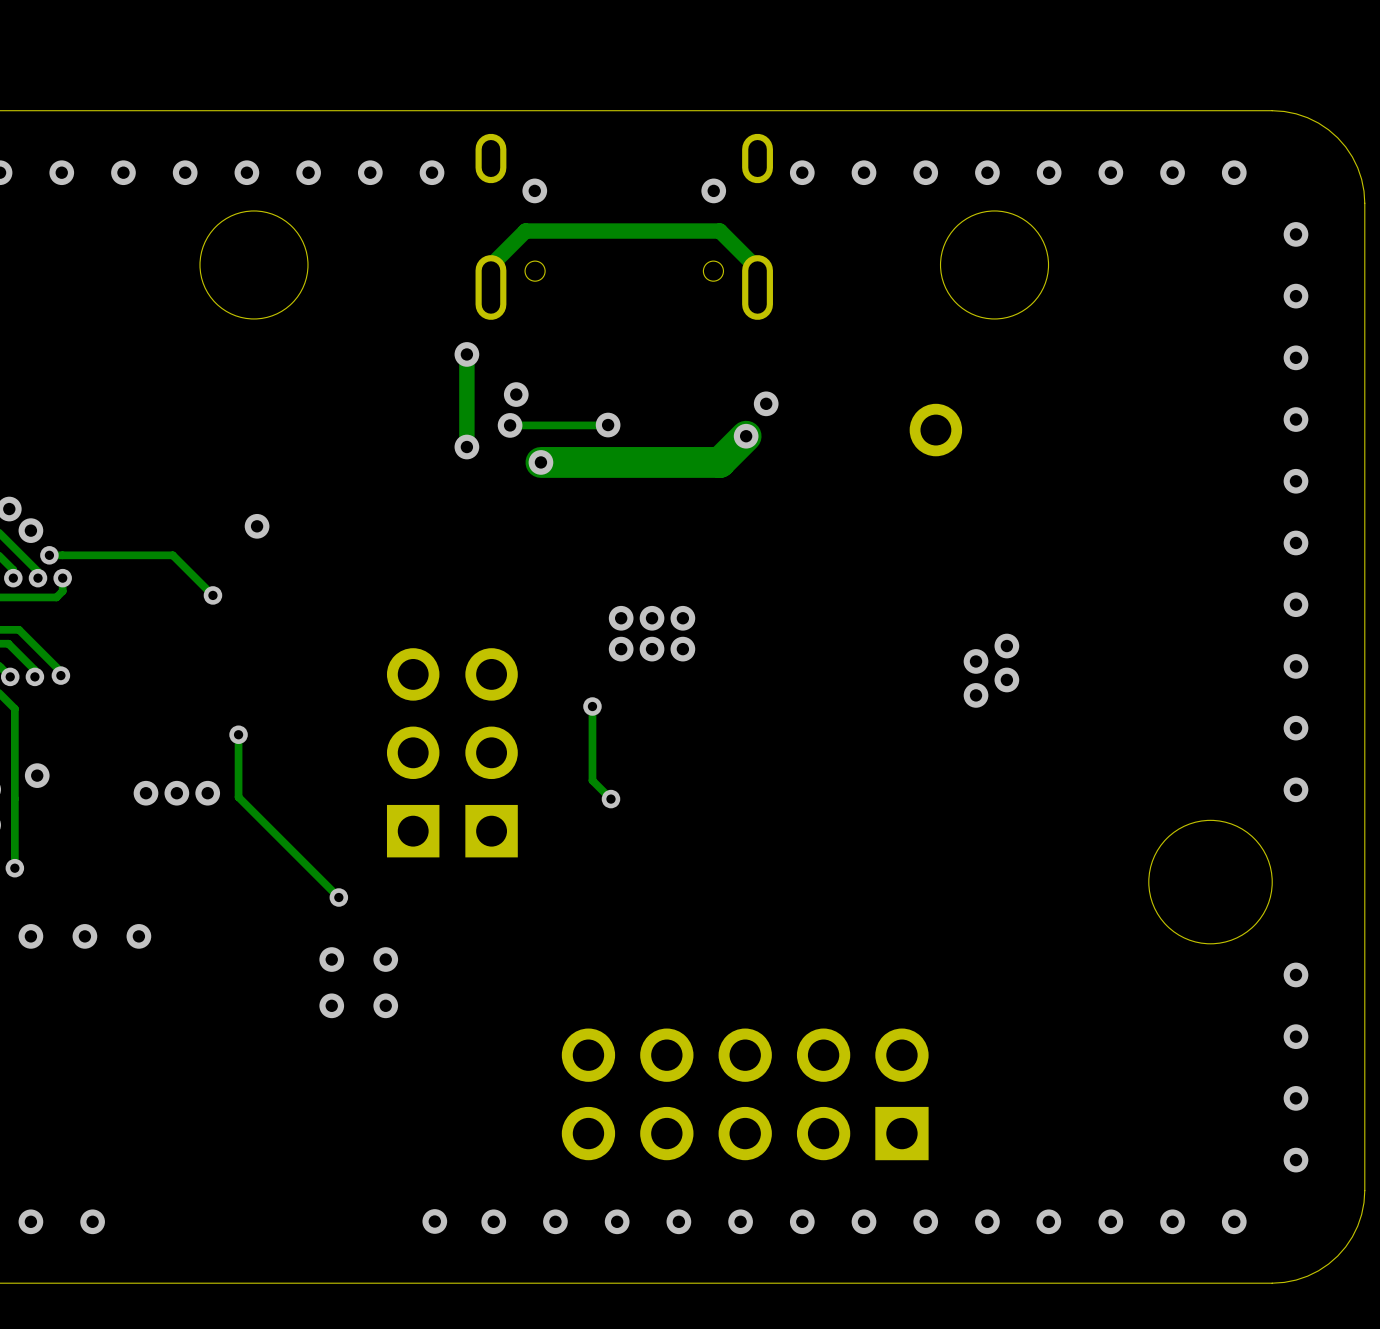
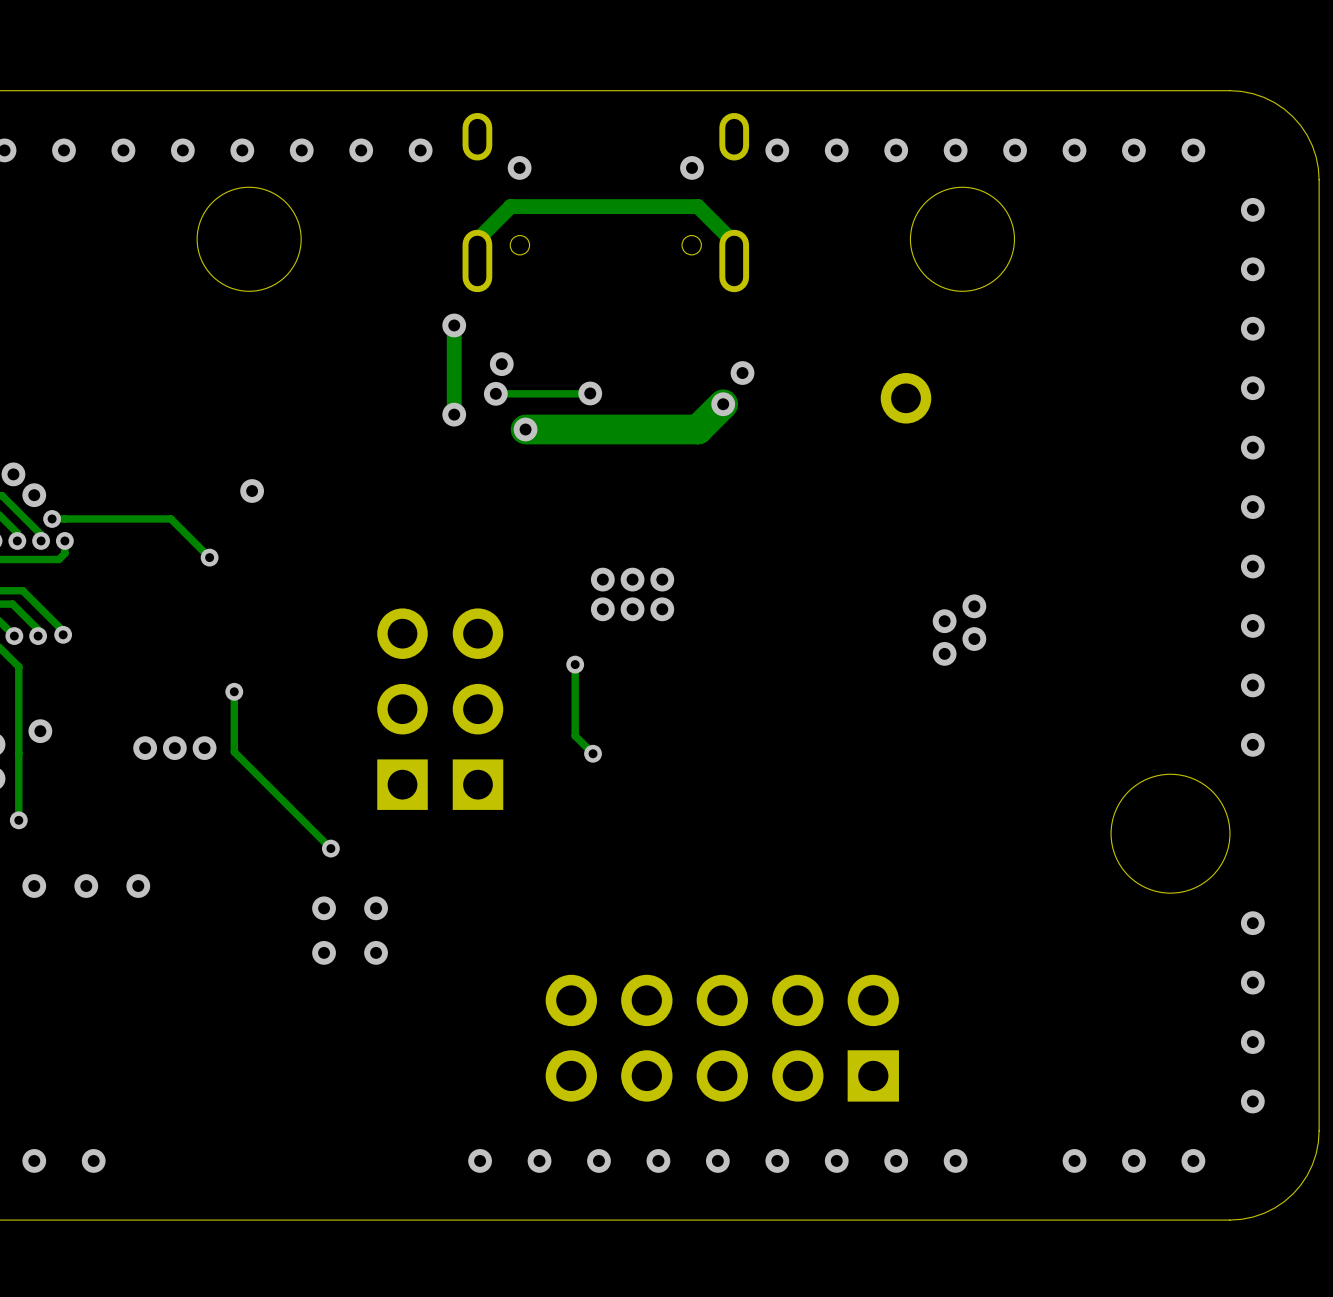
via: (434, 1221) -> none
via: (1048, 1221) -> none

